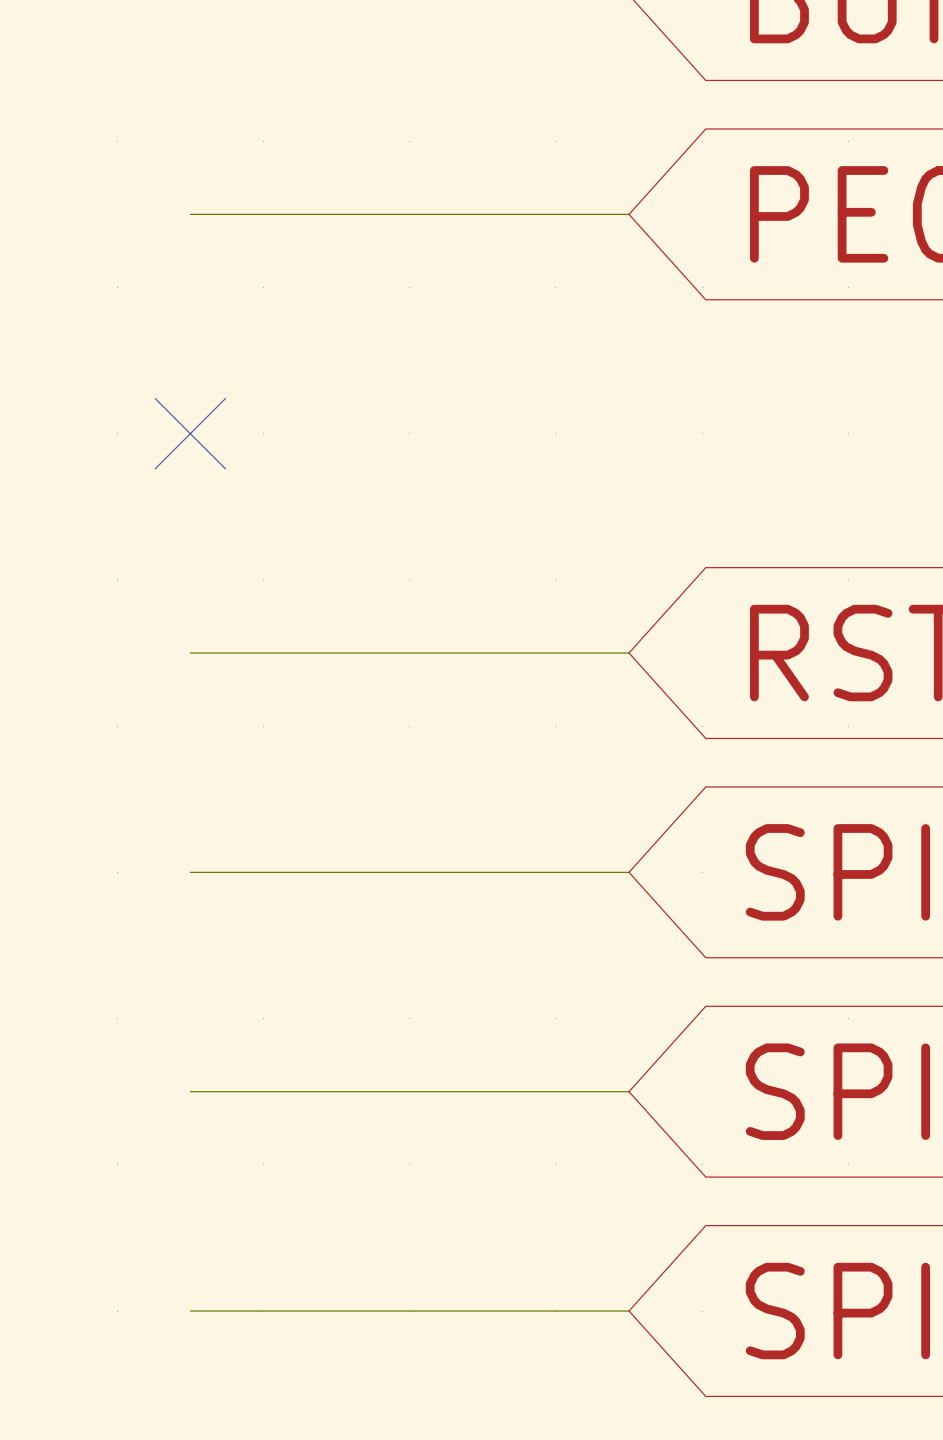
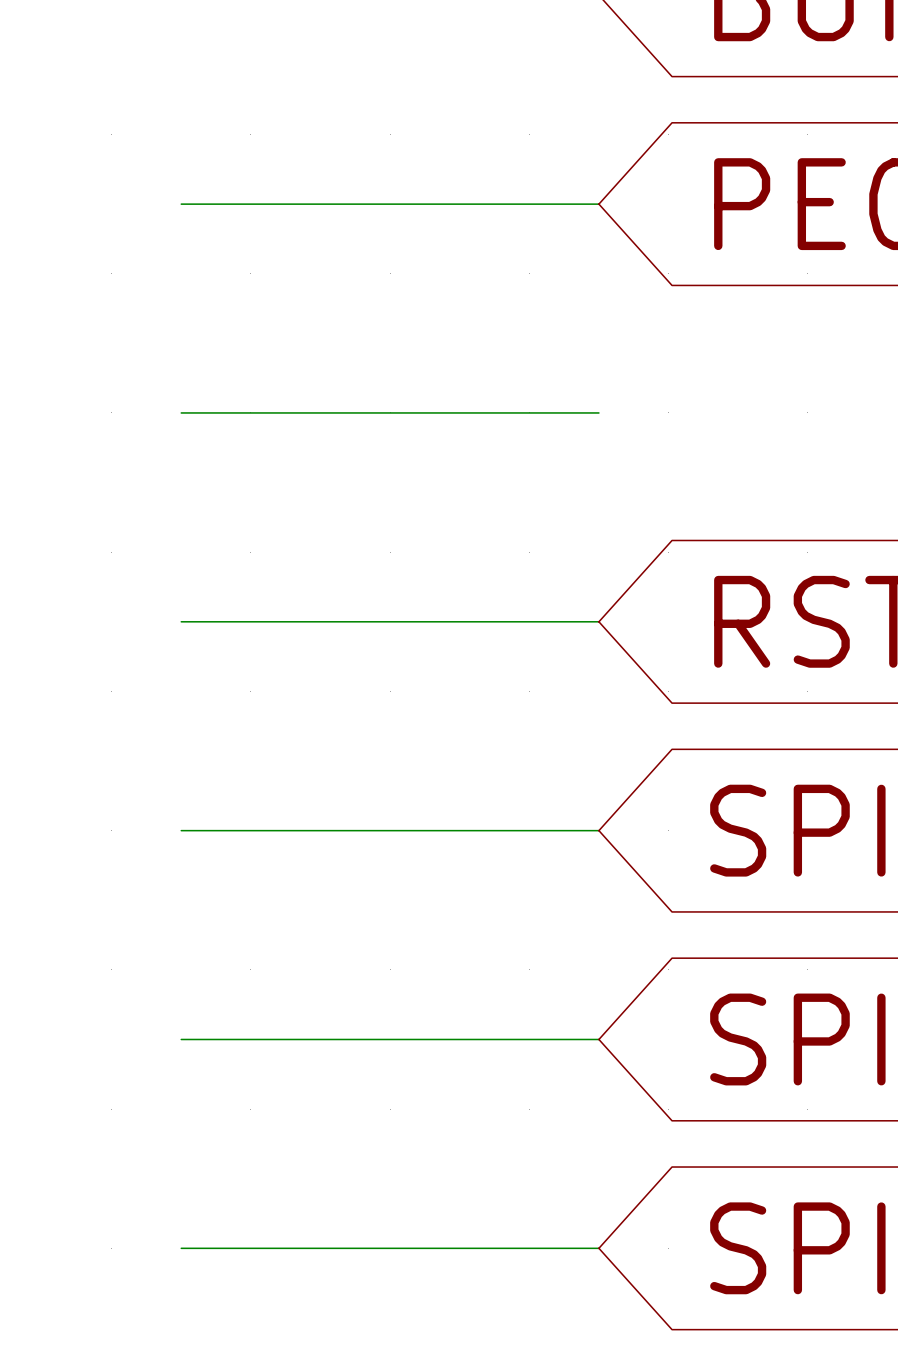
wire: none -> (181, 412) (598, 412)
no-connect mark: (190, 433) -> none

